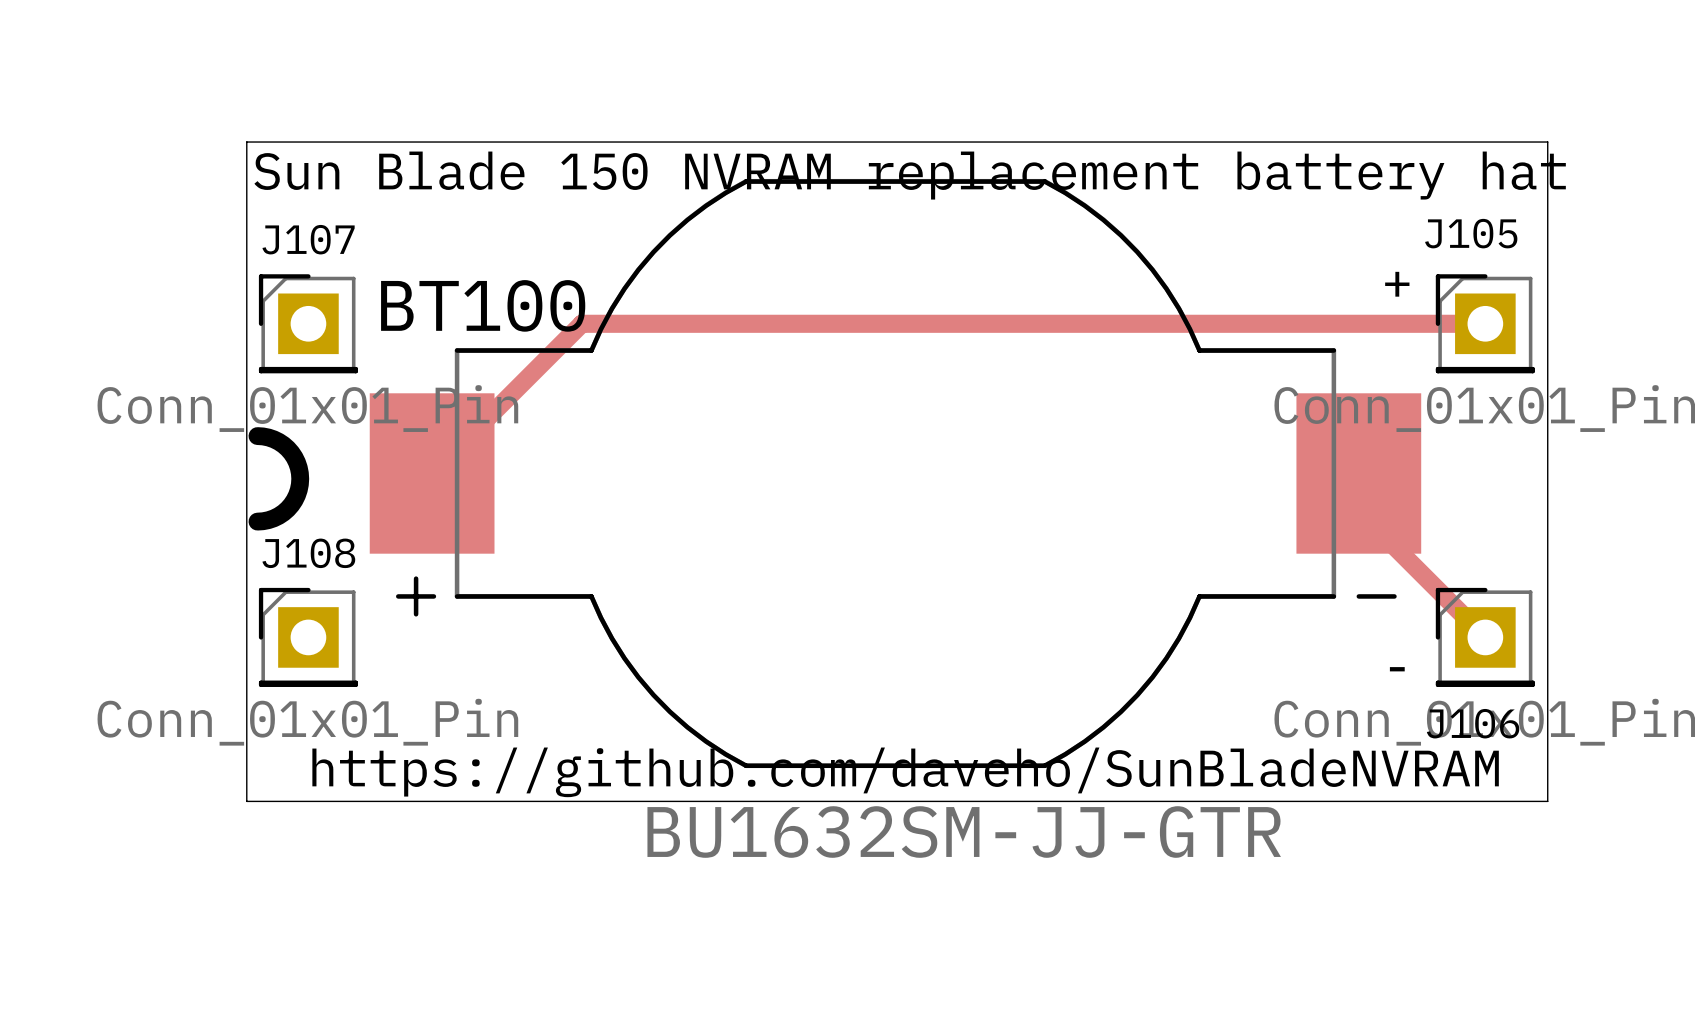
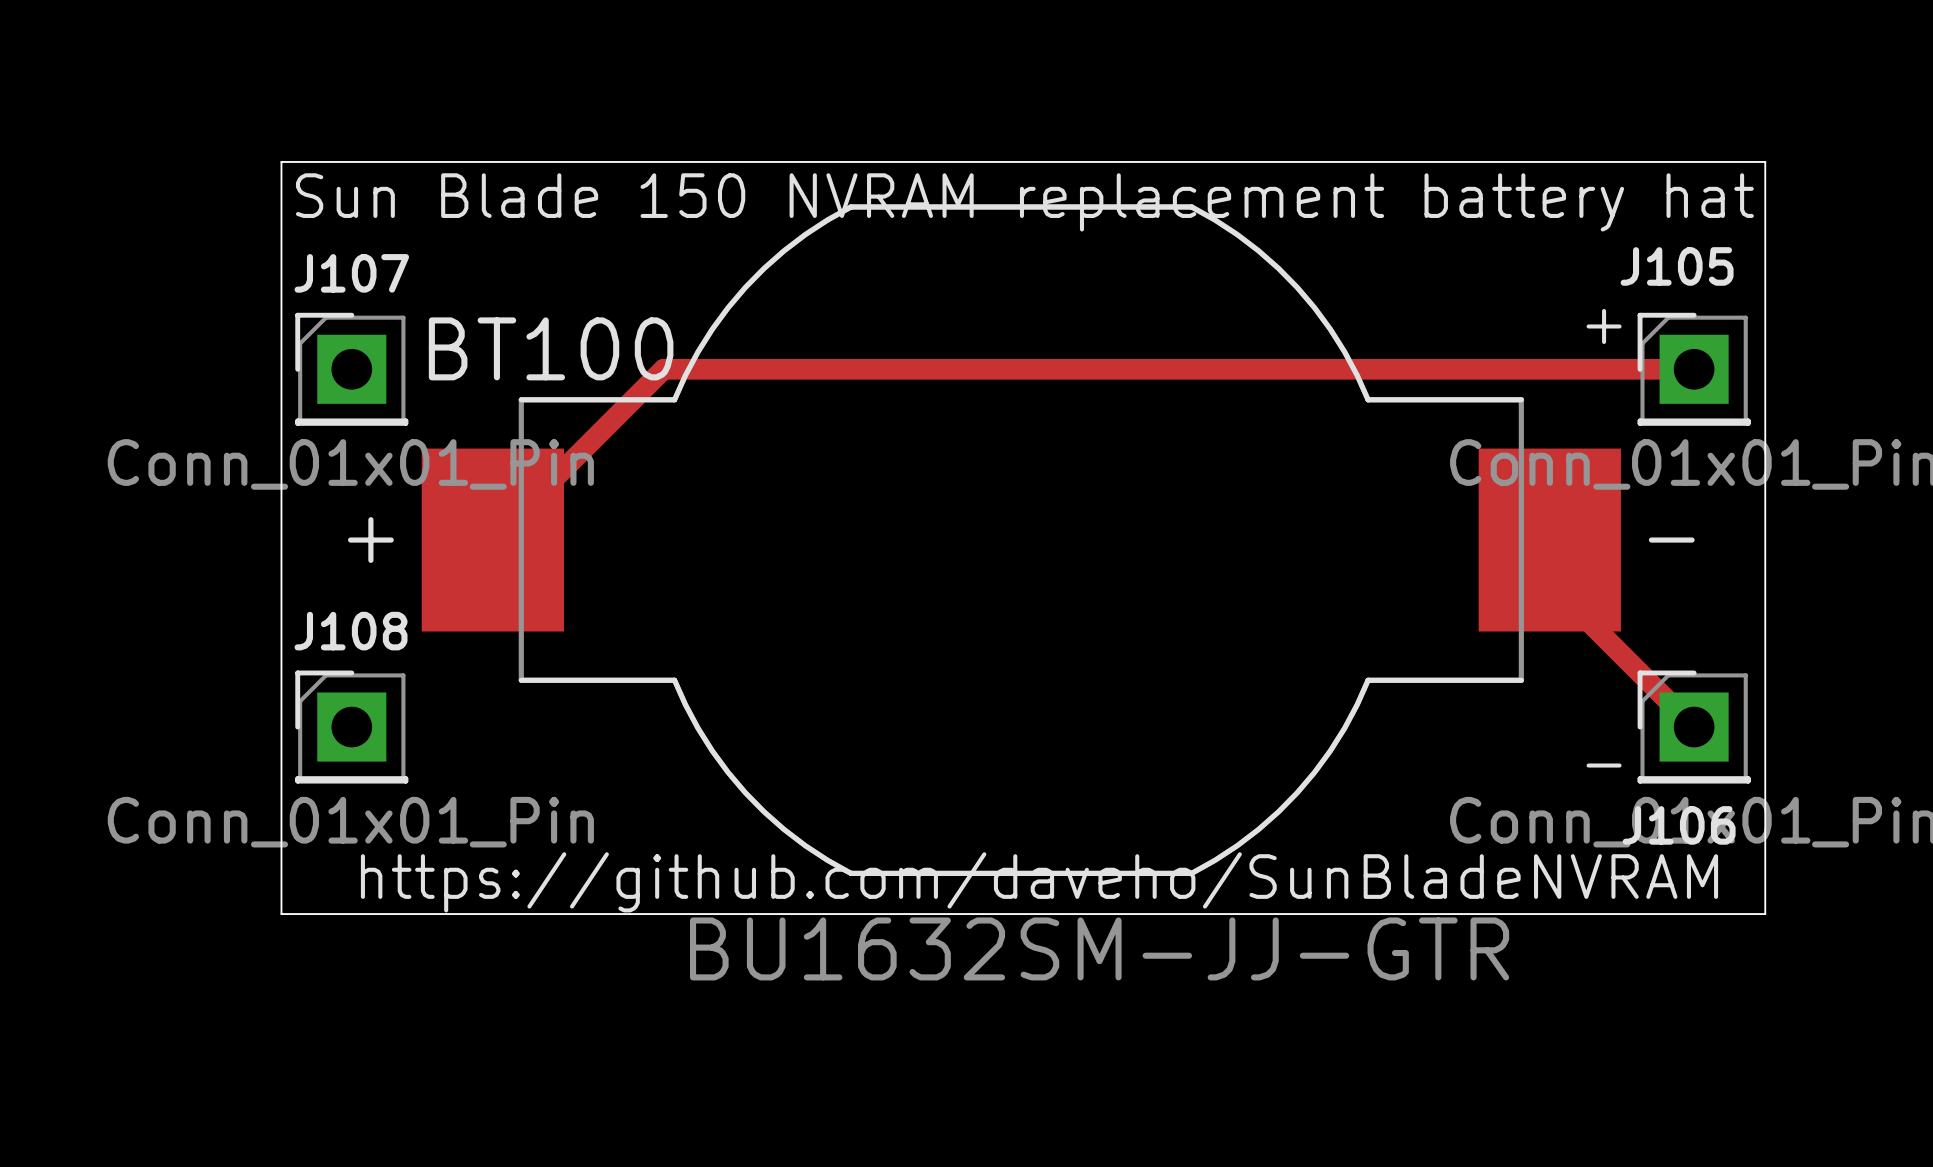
BT100 footprint: [369, 178, 1422, 769] -> [347, 204, 1695, 876]
line: (257, 436) (273, 439) (287, 448) (296, 462) (300, 478) (296, 495) (287, 509) (273, 518) (257, 521) -> none

